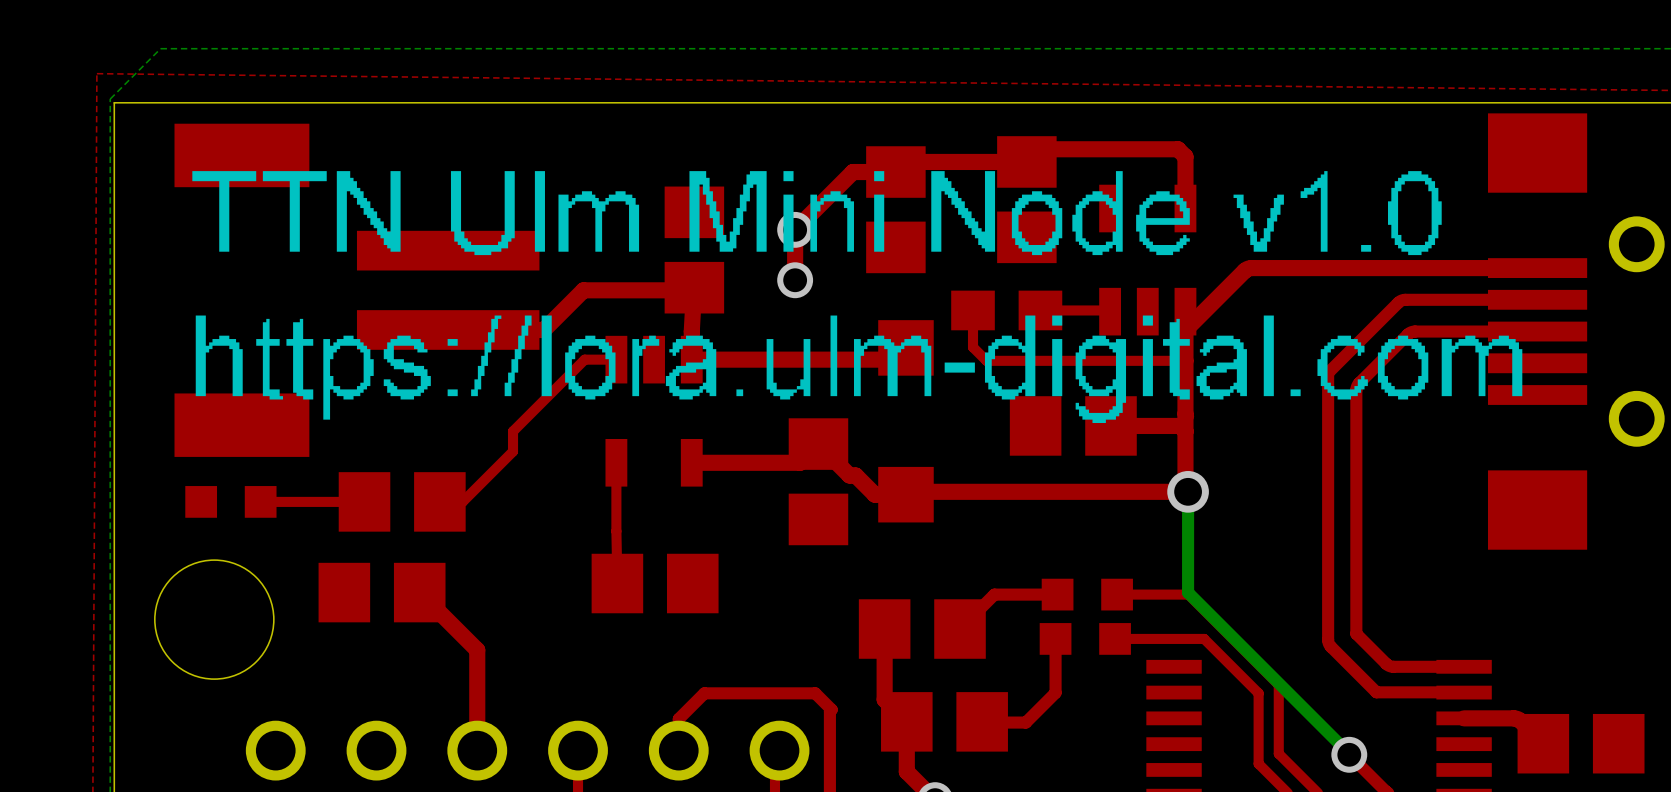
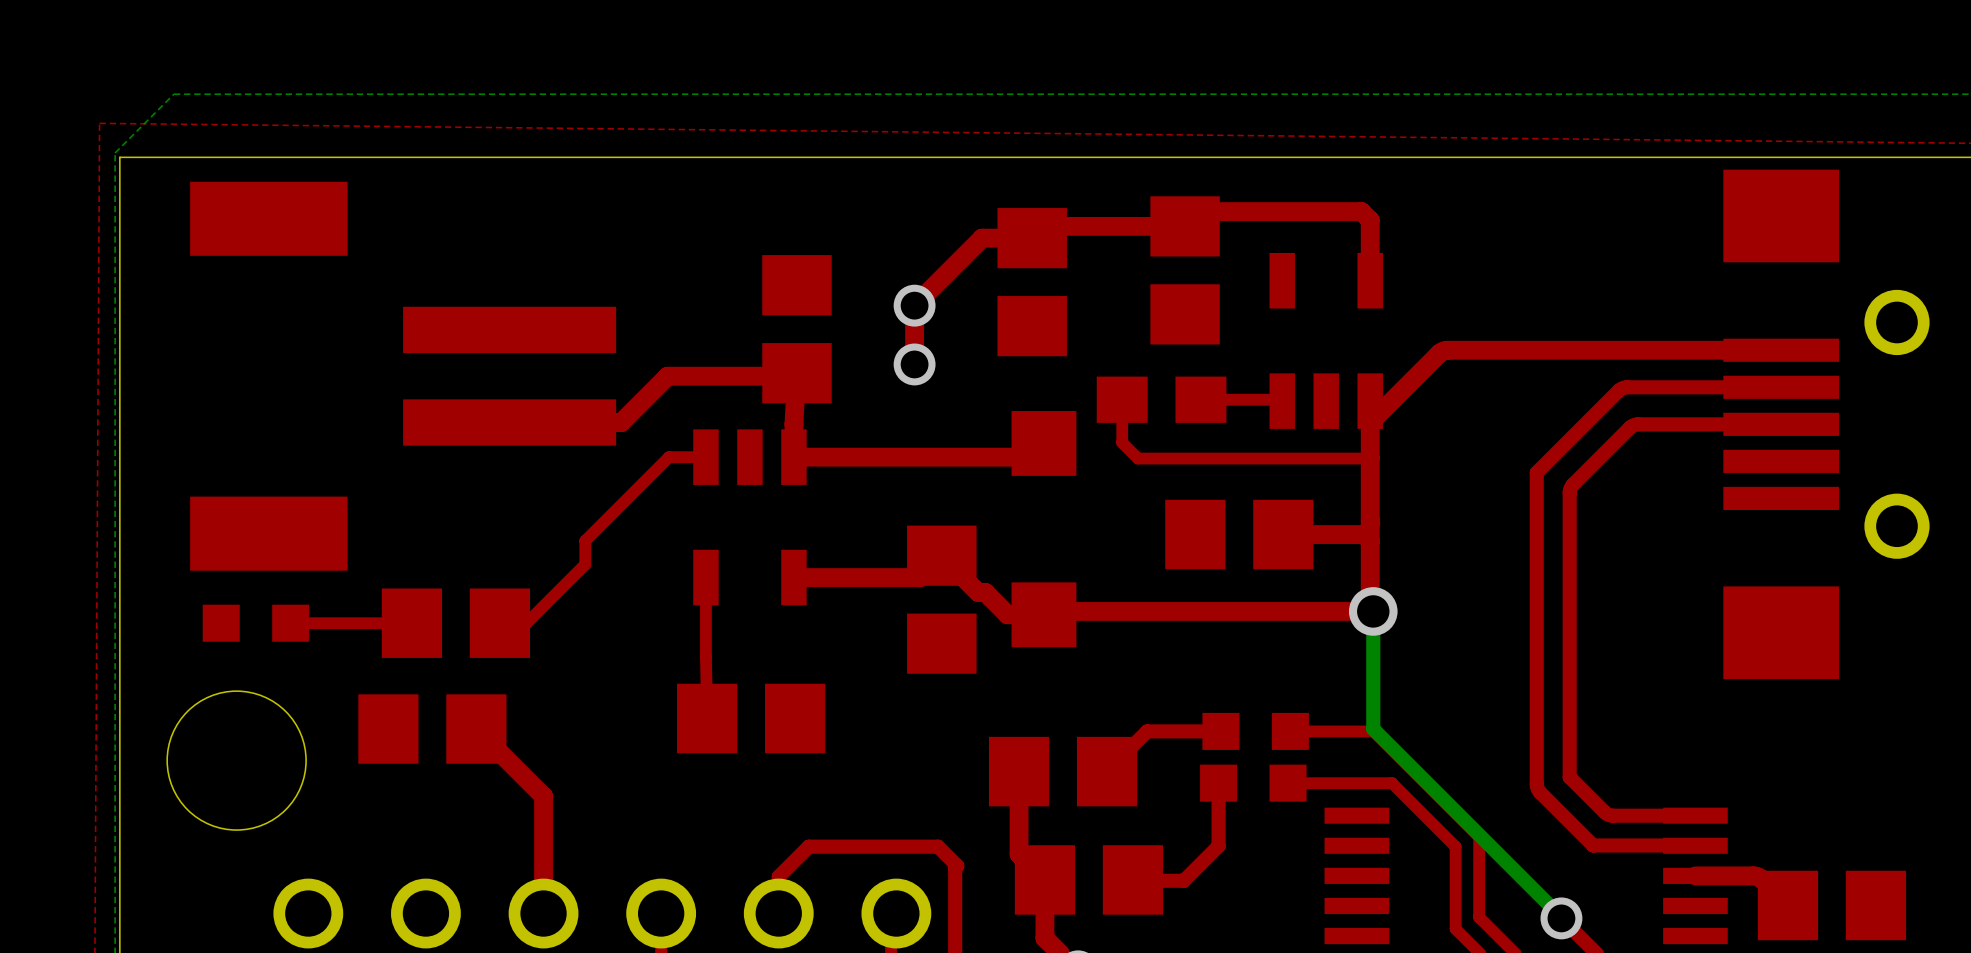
drawing: [192, 171, 401, 252] -> none
drawing: [450, 171, 640, 256] -> none
drawing: [689, 171, 1442, 256] -> none
drawing: [195, 315, 1523, 423] -> none

